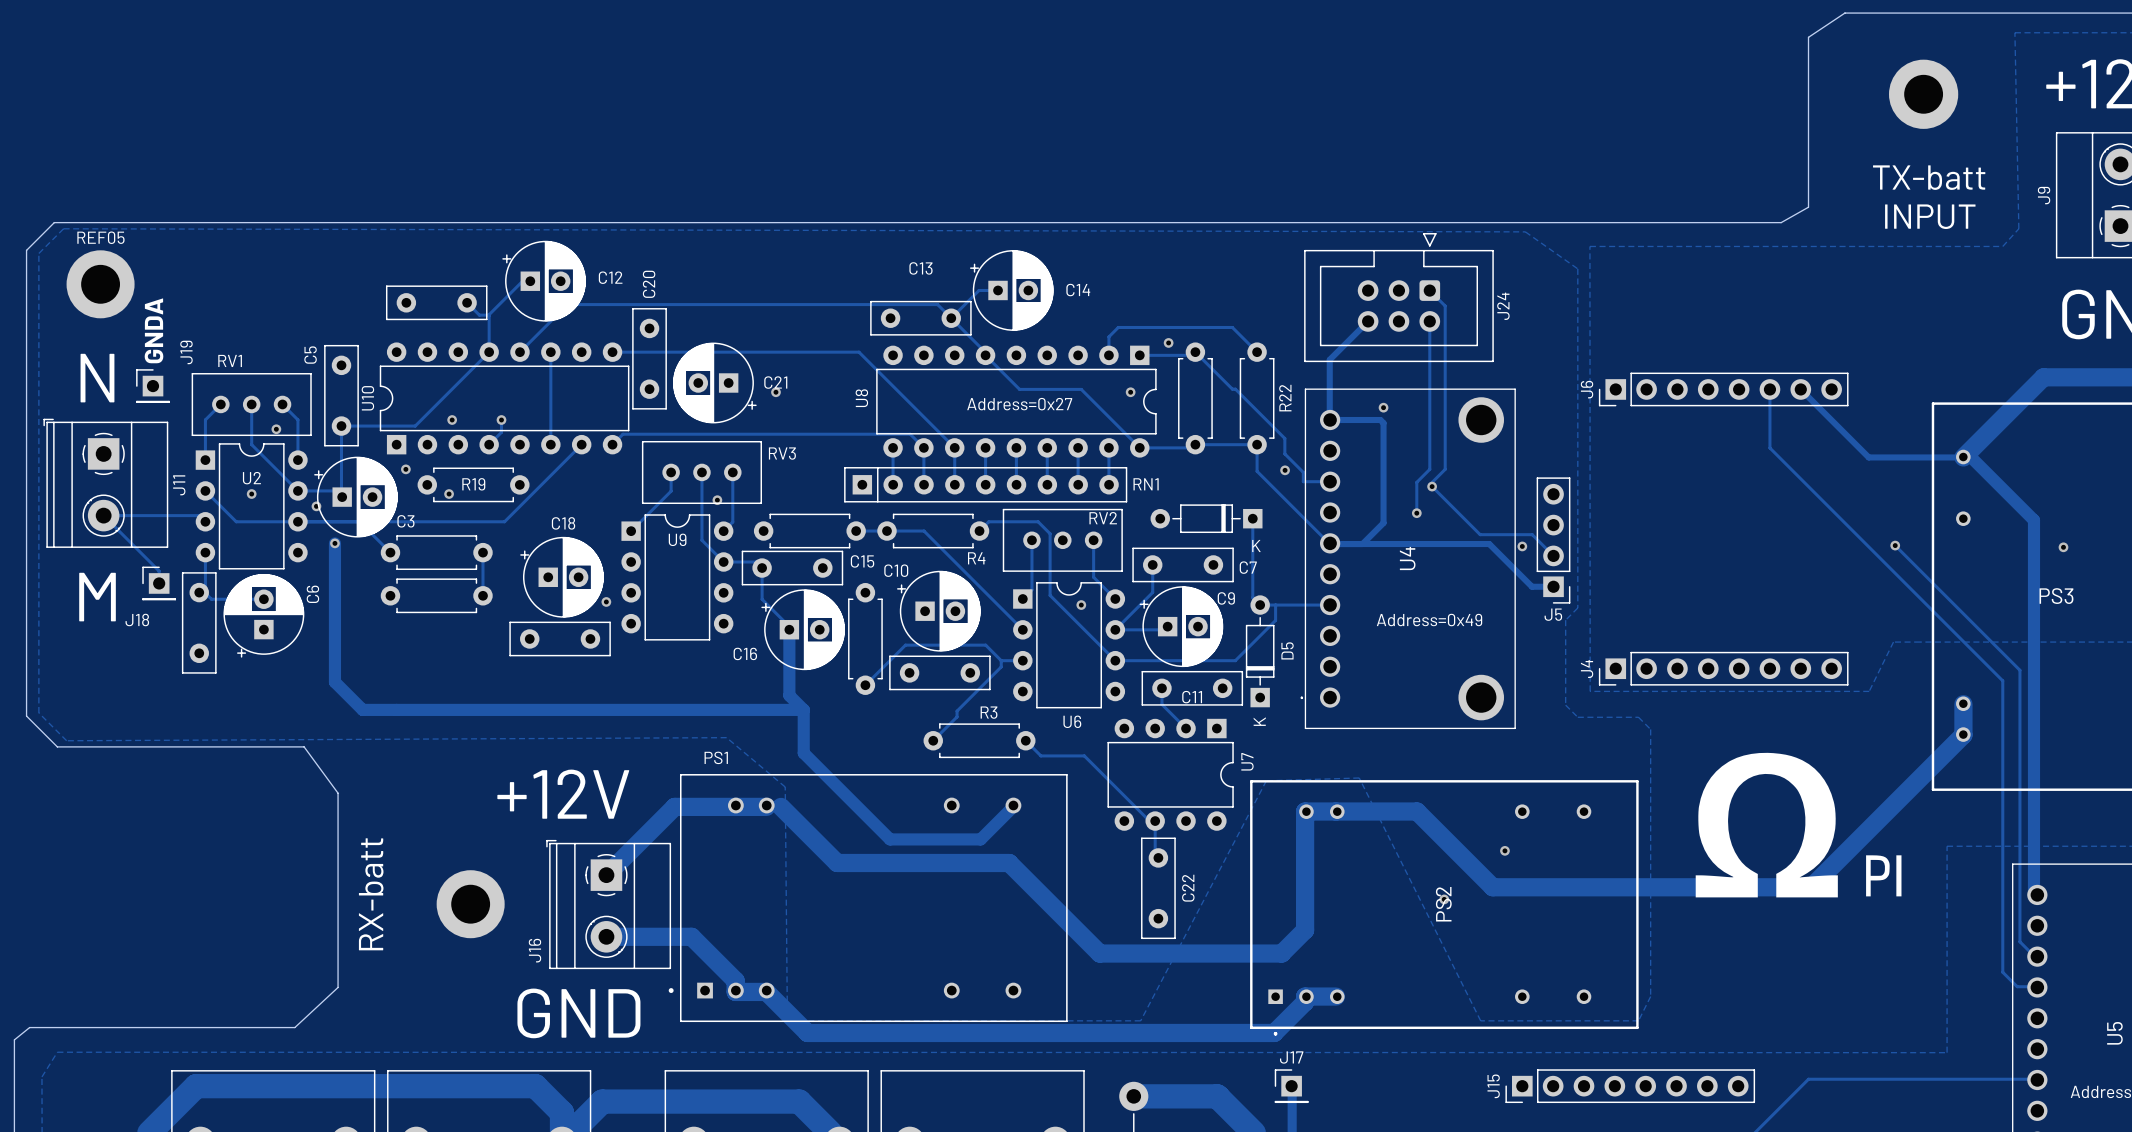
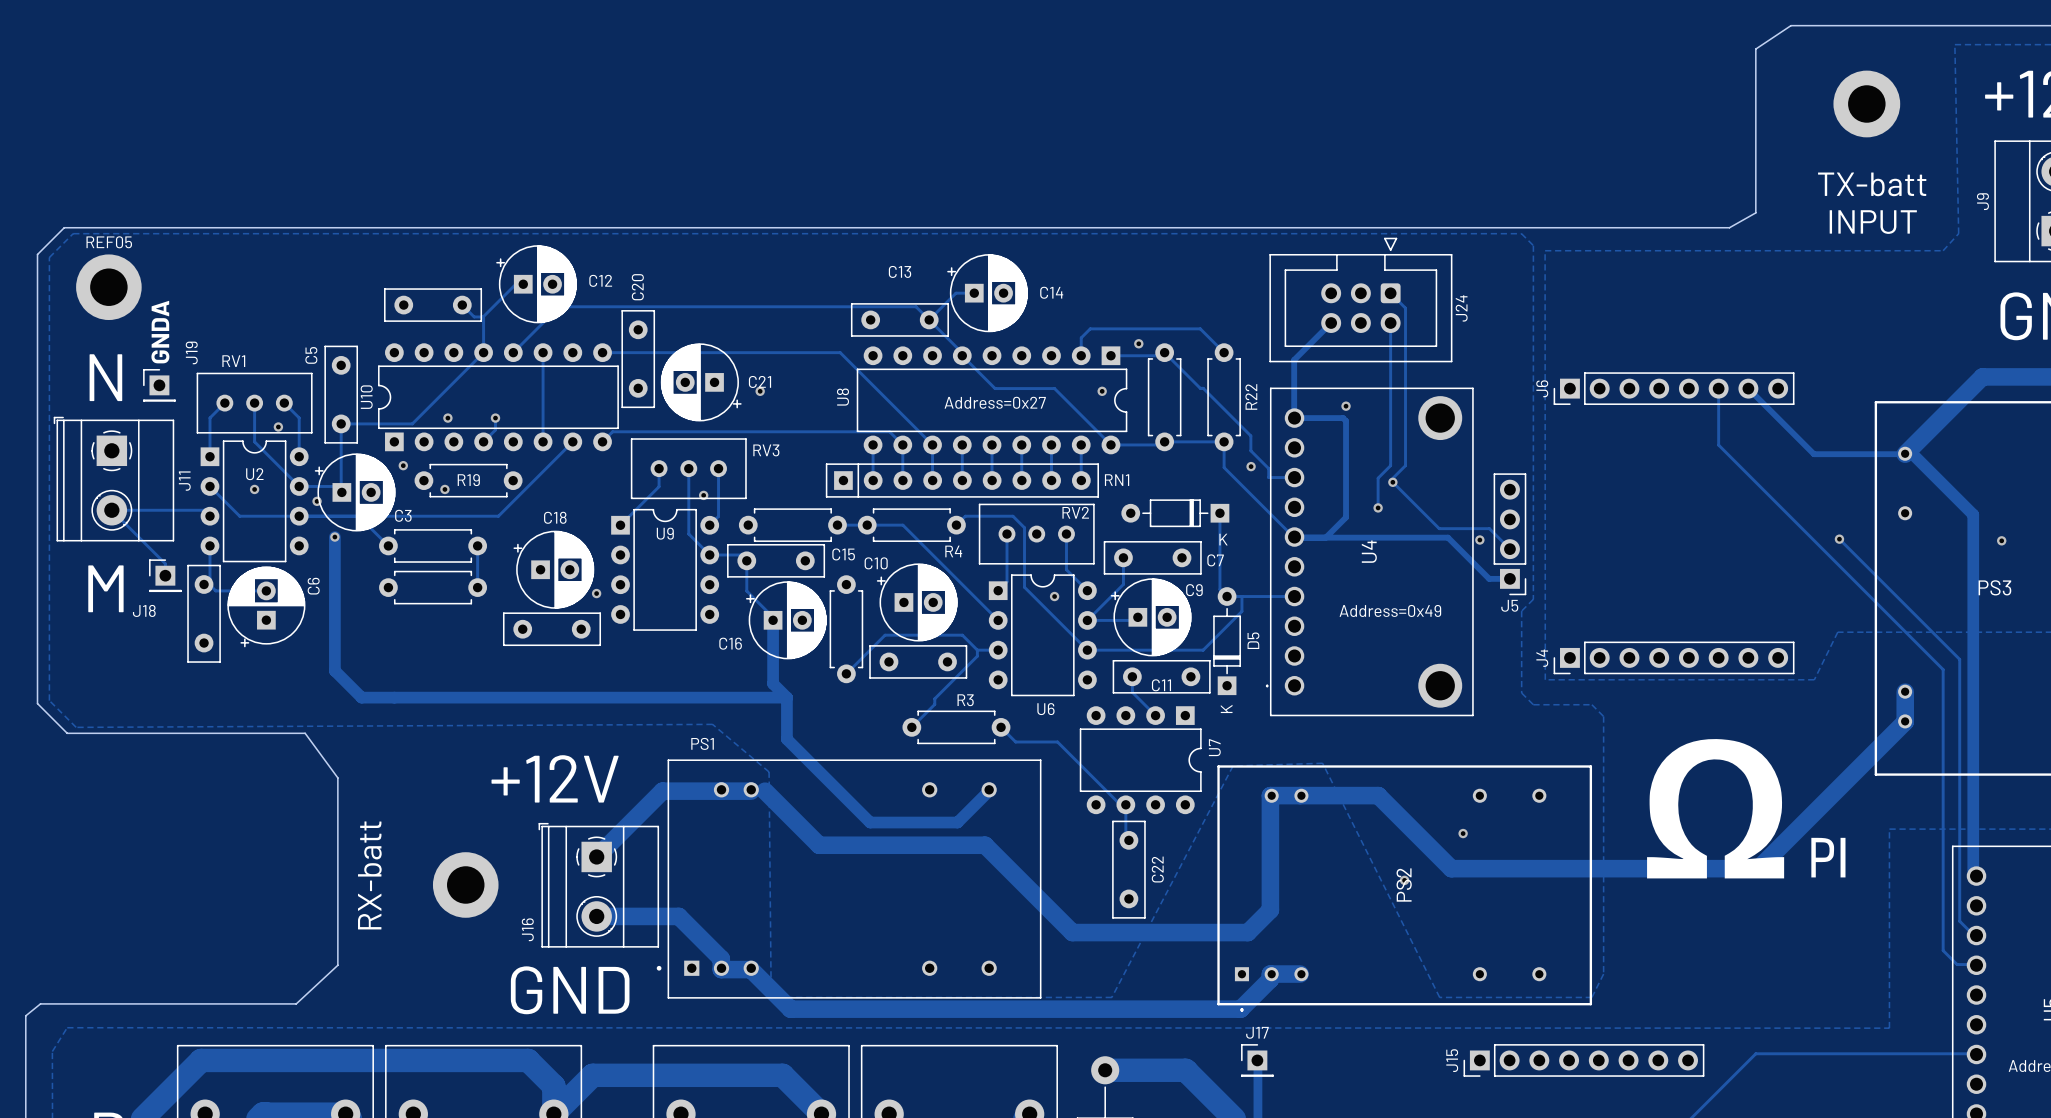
zone outline: (63, 228) (1525, 231) (1577, 268) (1577, 608) -> (73, 233) (1521, 233) (1533, 245) (1533, 599)

